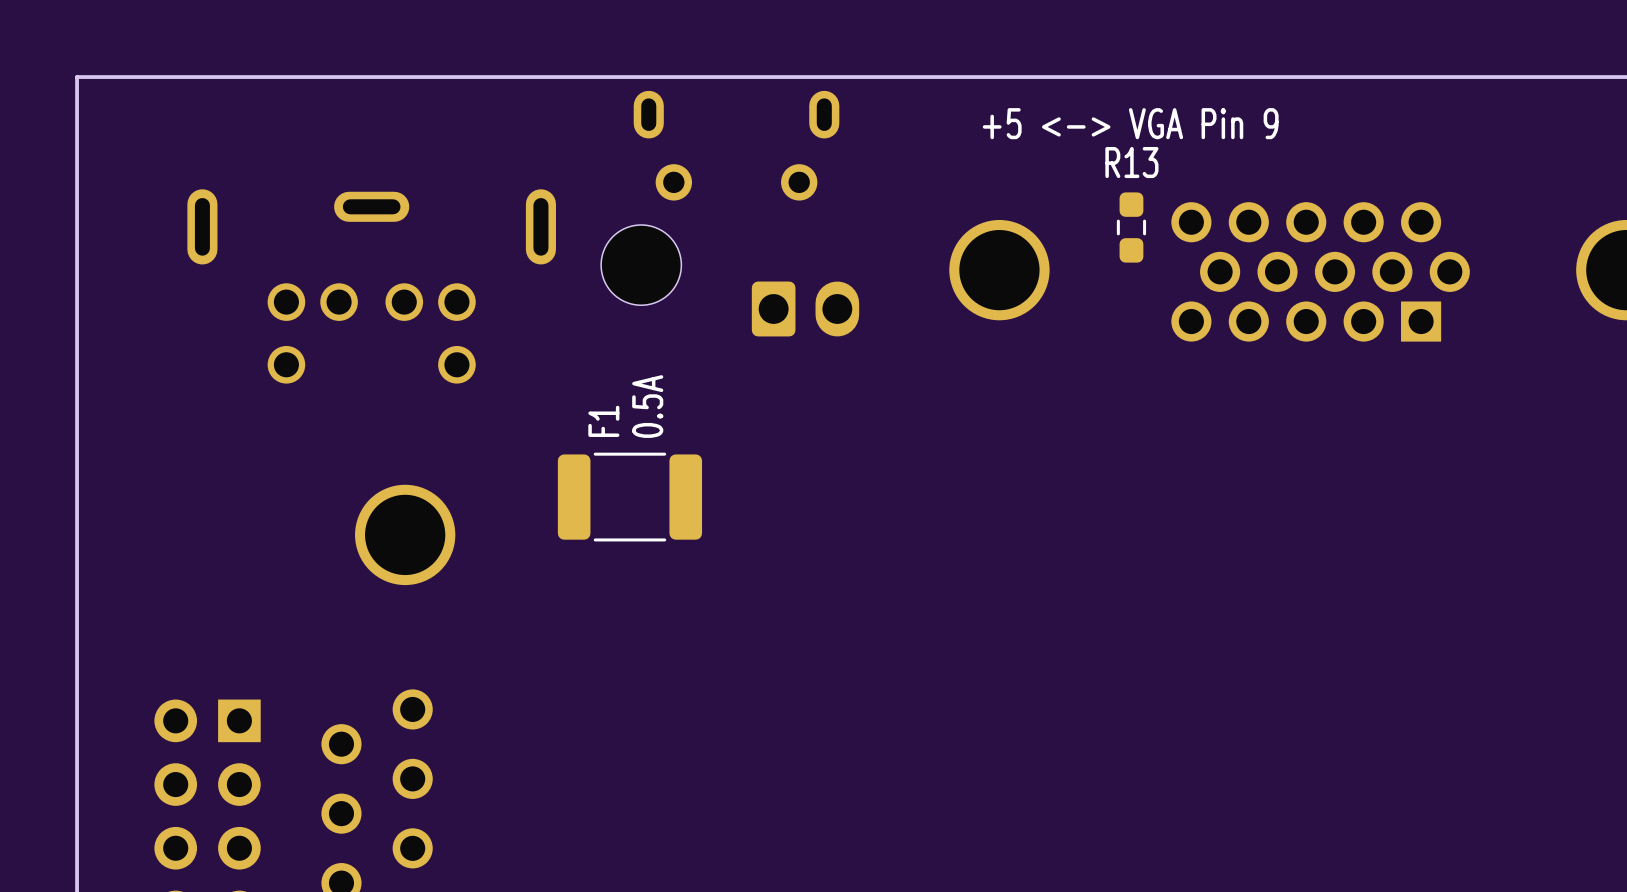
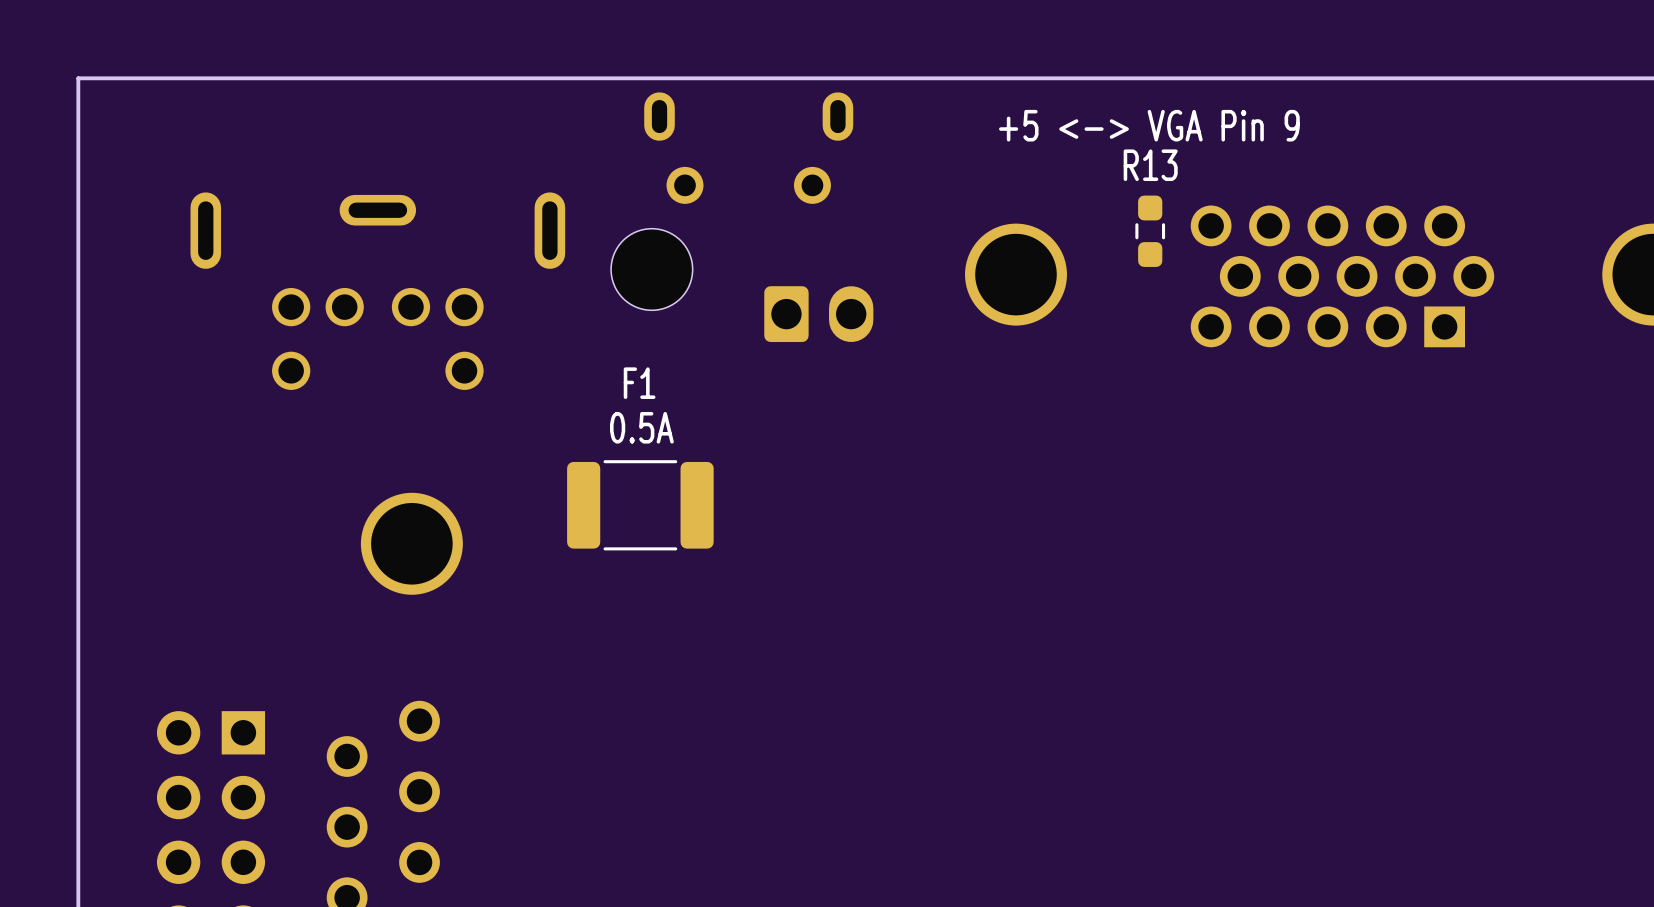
F1 value rotation: 0° (647, 406) -> 90° clockwise (641, 427)
F1 name rotation: 0° (603, 421) -> 90° clockwise (639, 383)

